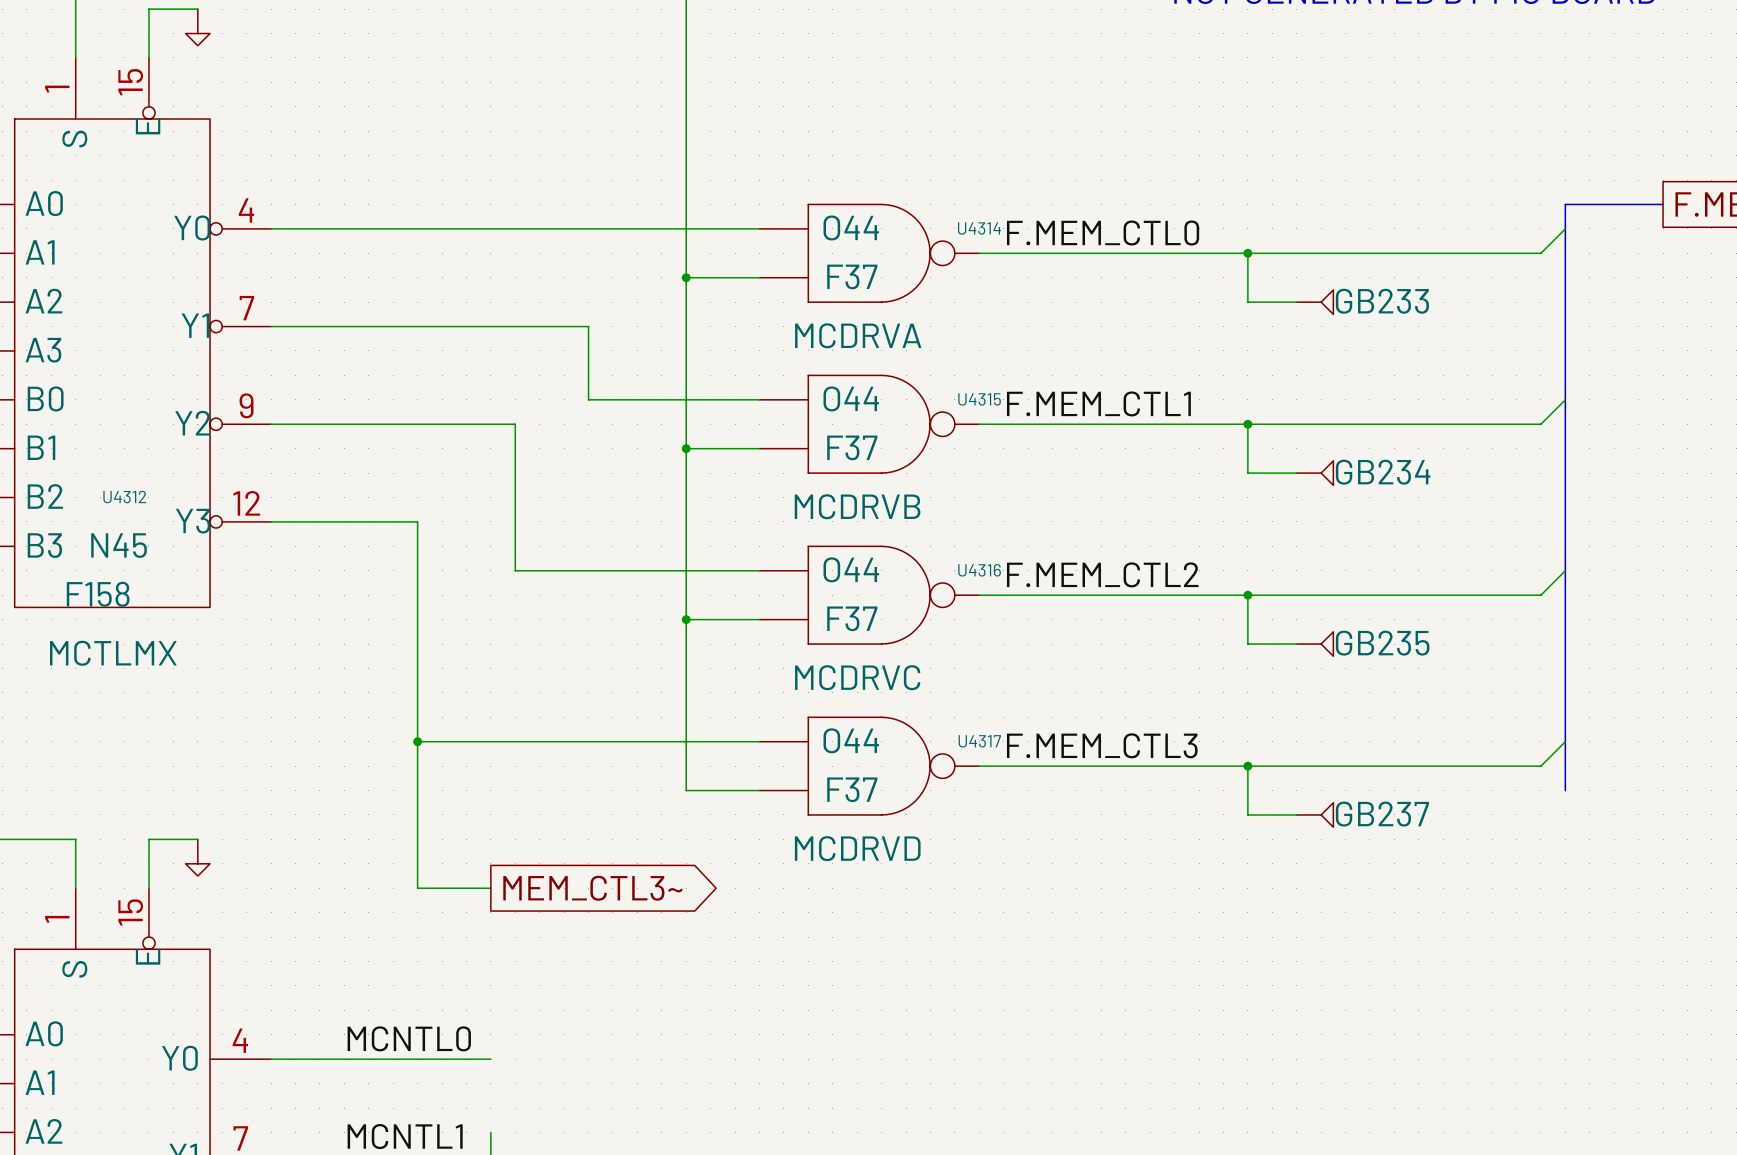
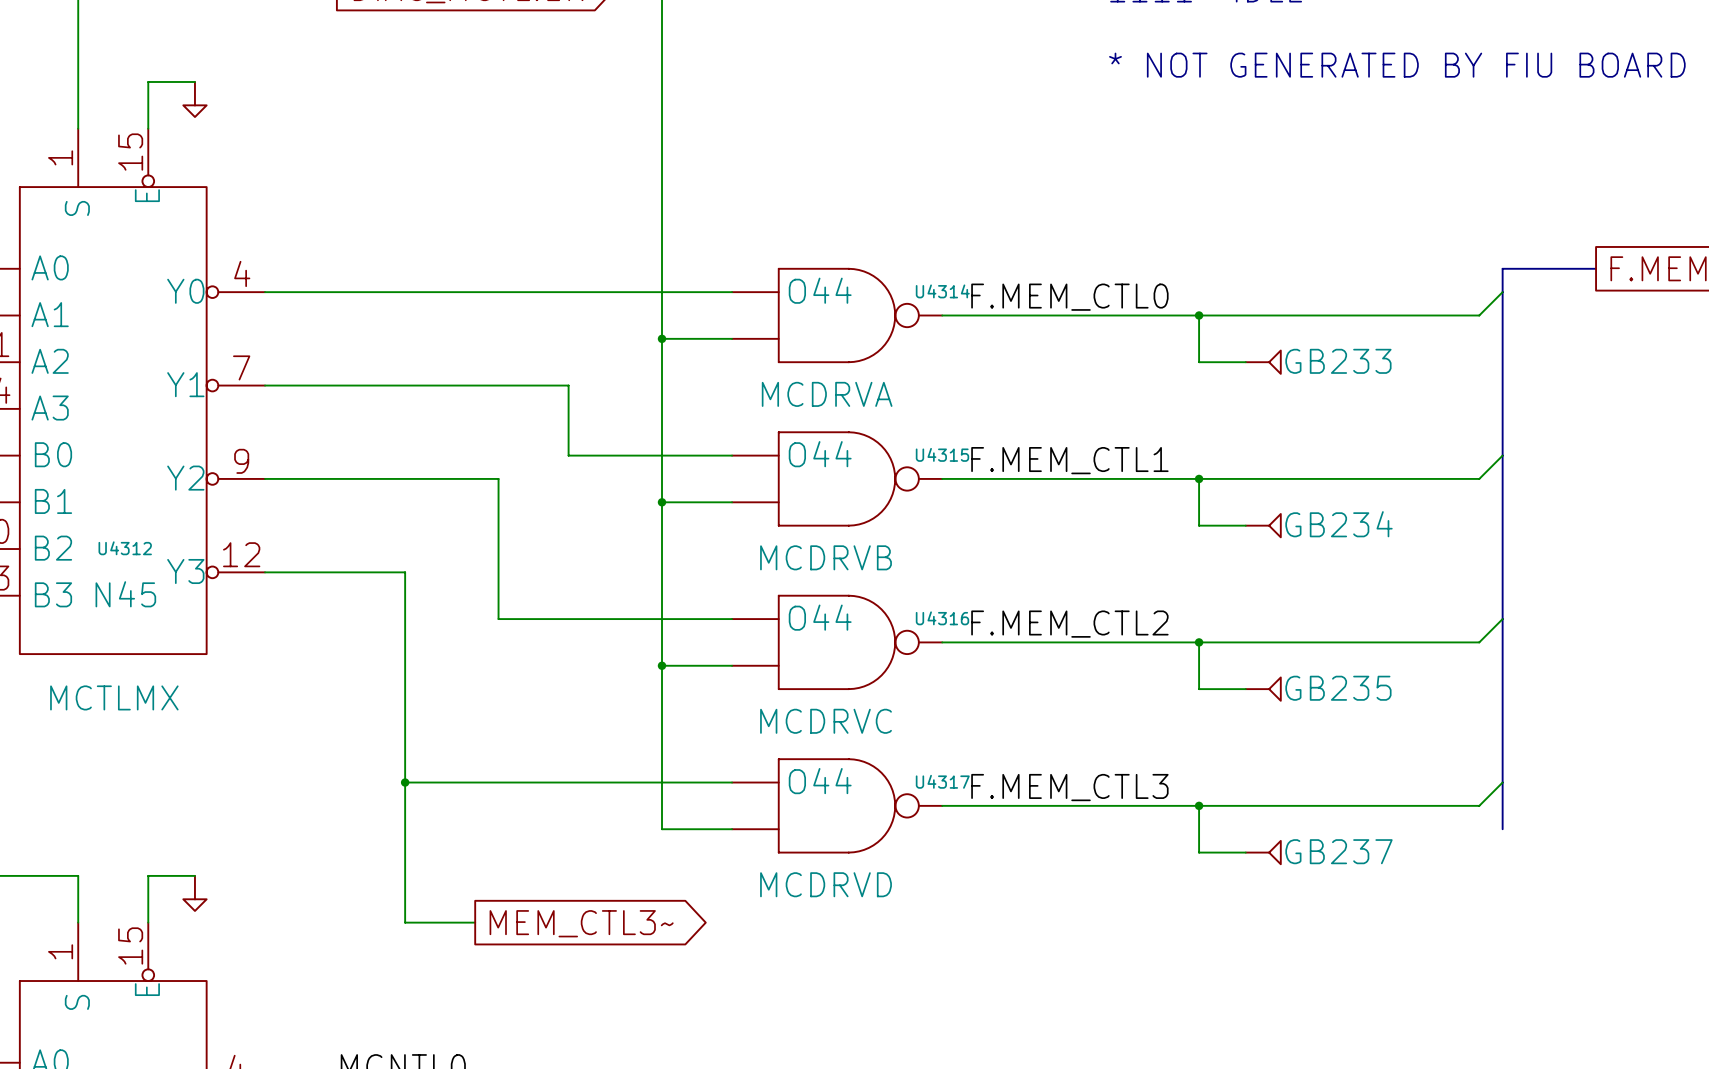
U4314 value: F37 (852, 276) -> none
U4315 value: F37 (852, 447) -> none
U4312 value: F158 (98, 594) -> none
U4316 value: F37 (852, 618) -> none
U4317 value: F37 (852, 789) -> none

